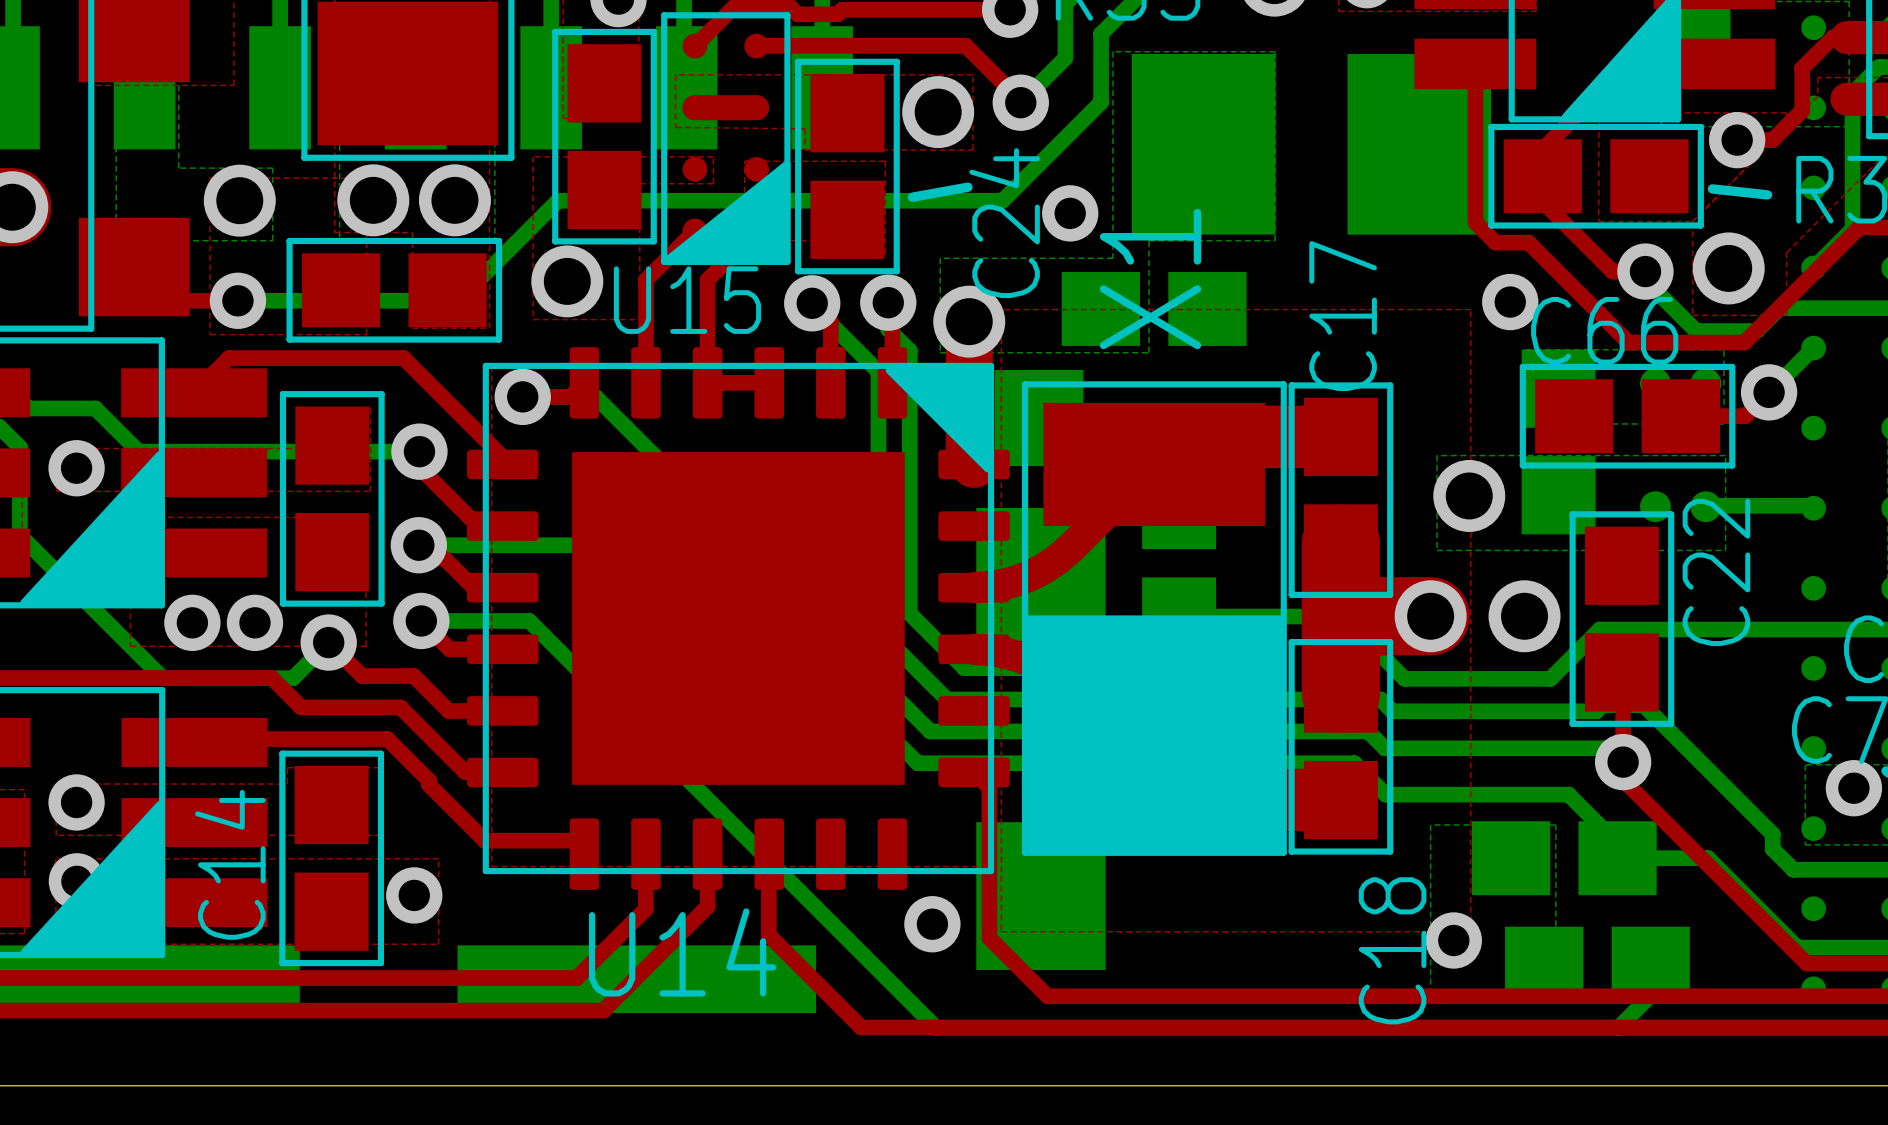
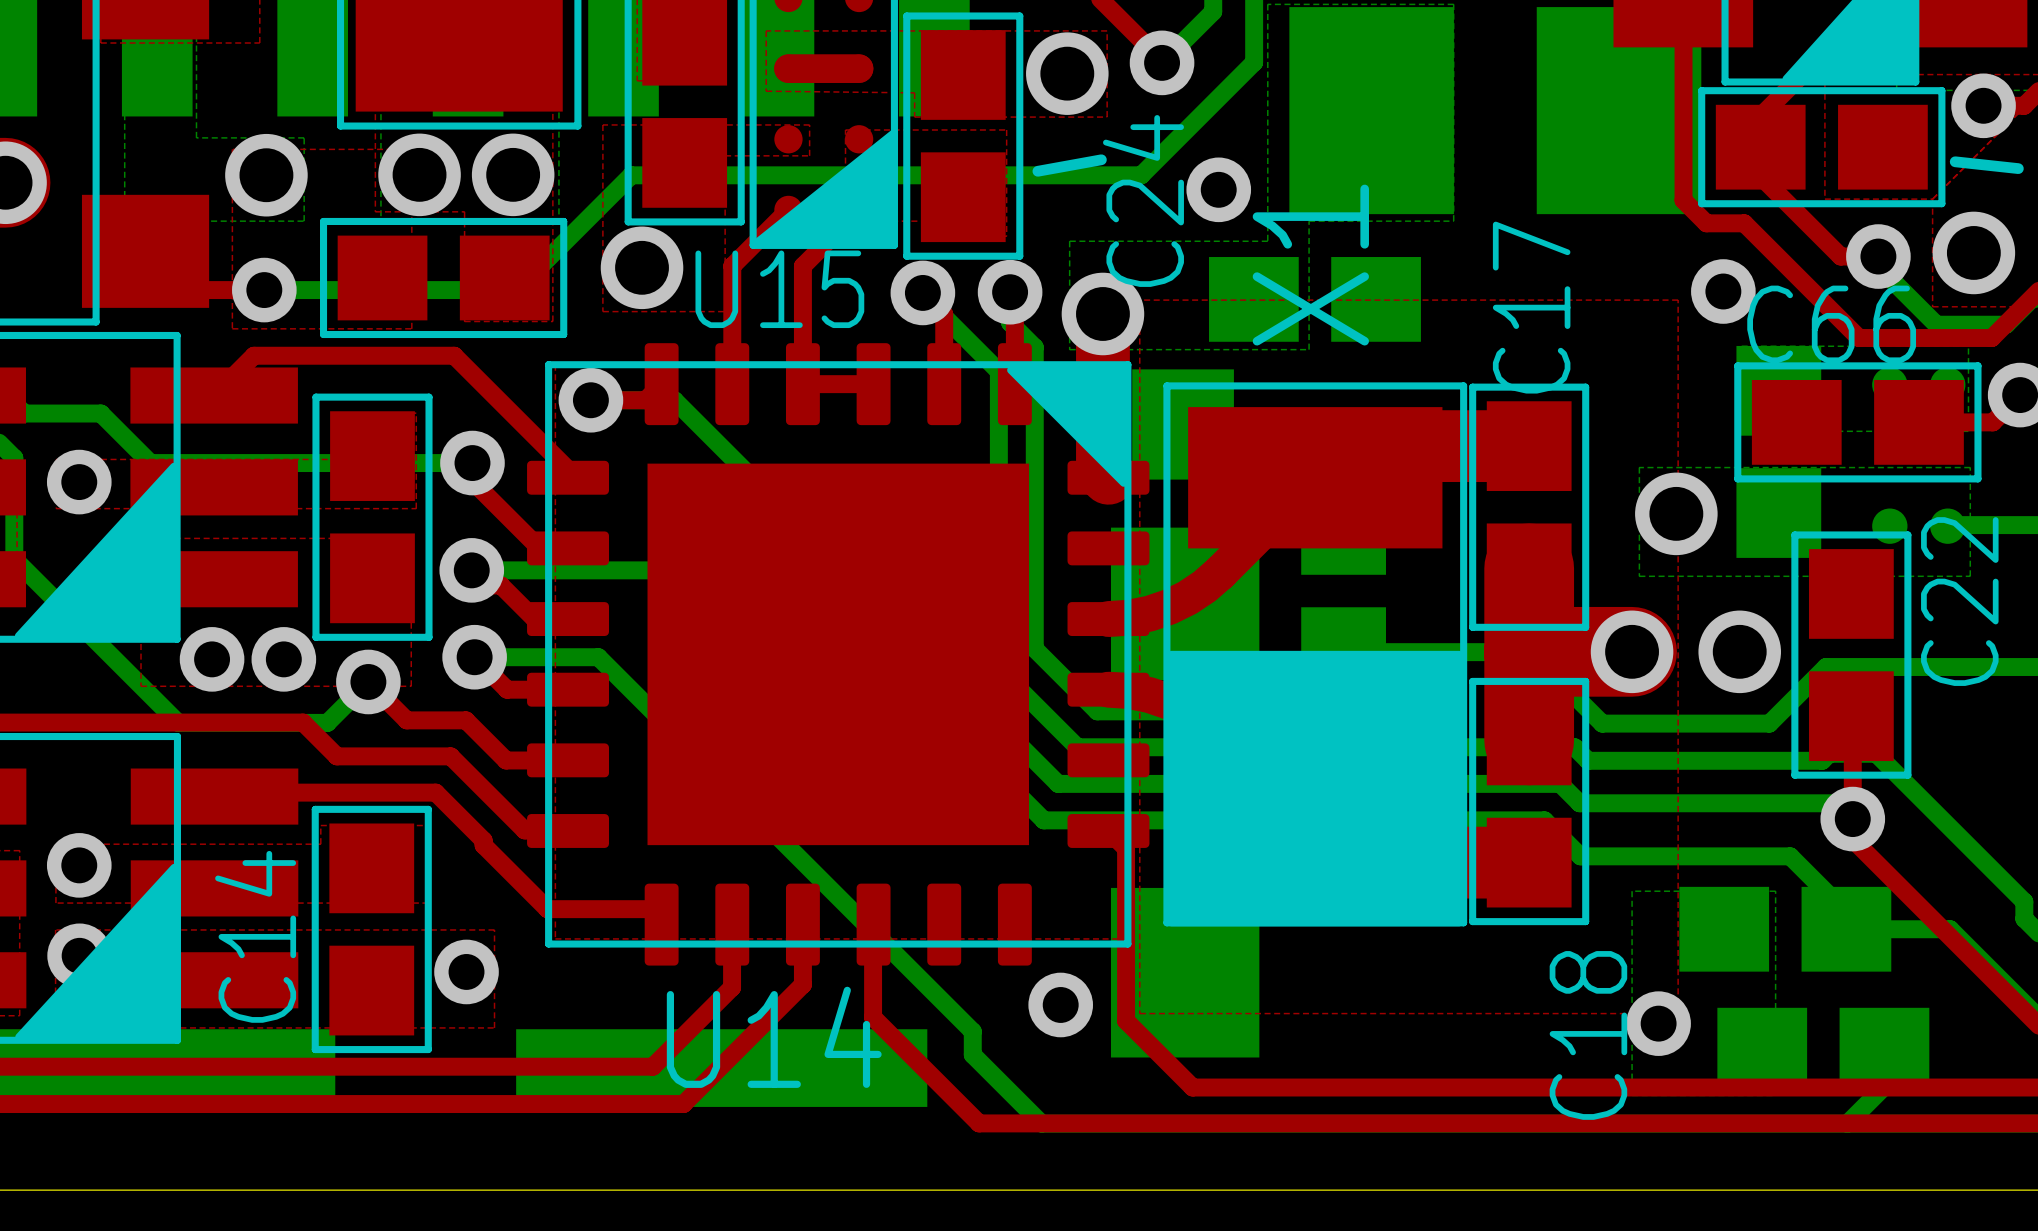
bottom track: (855, 947) (936, 1027) -> (972, 1031) (972, 1054) (1041, 1123) (1064, 1123)

